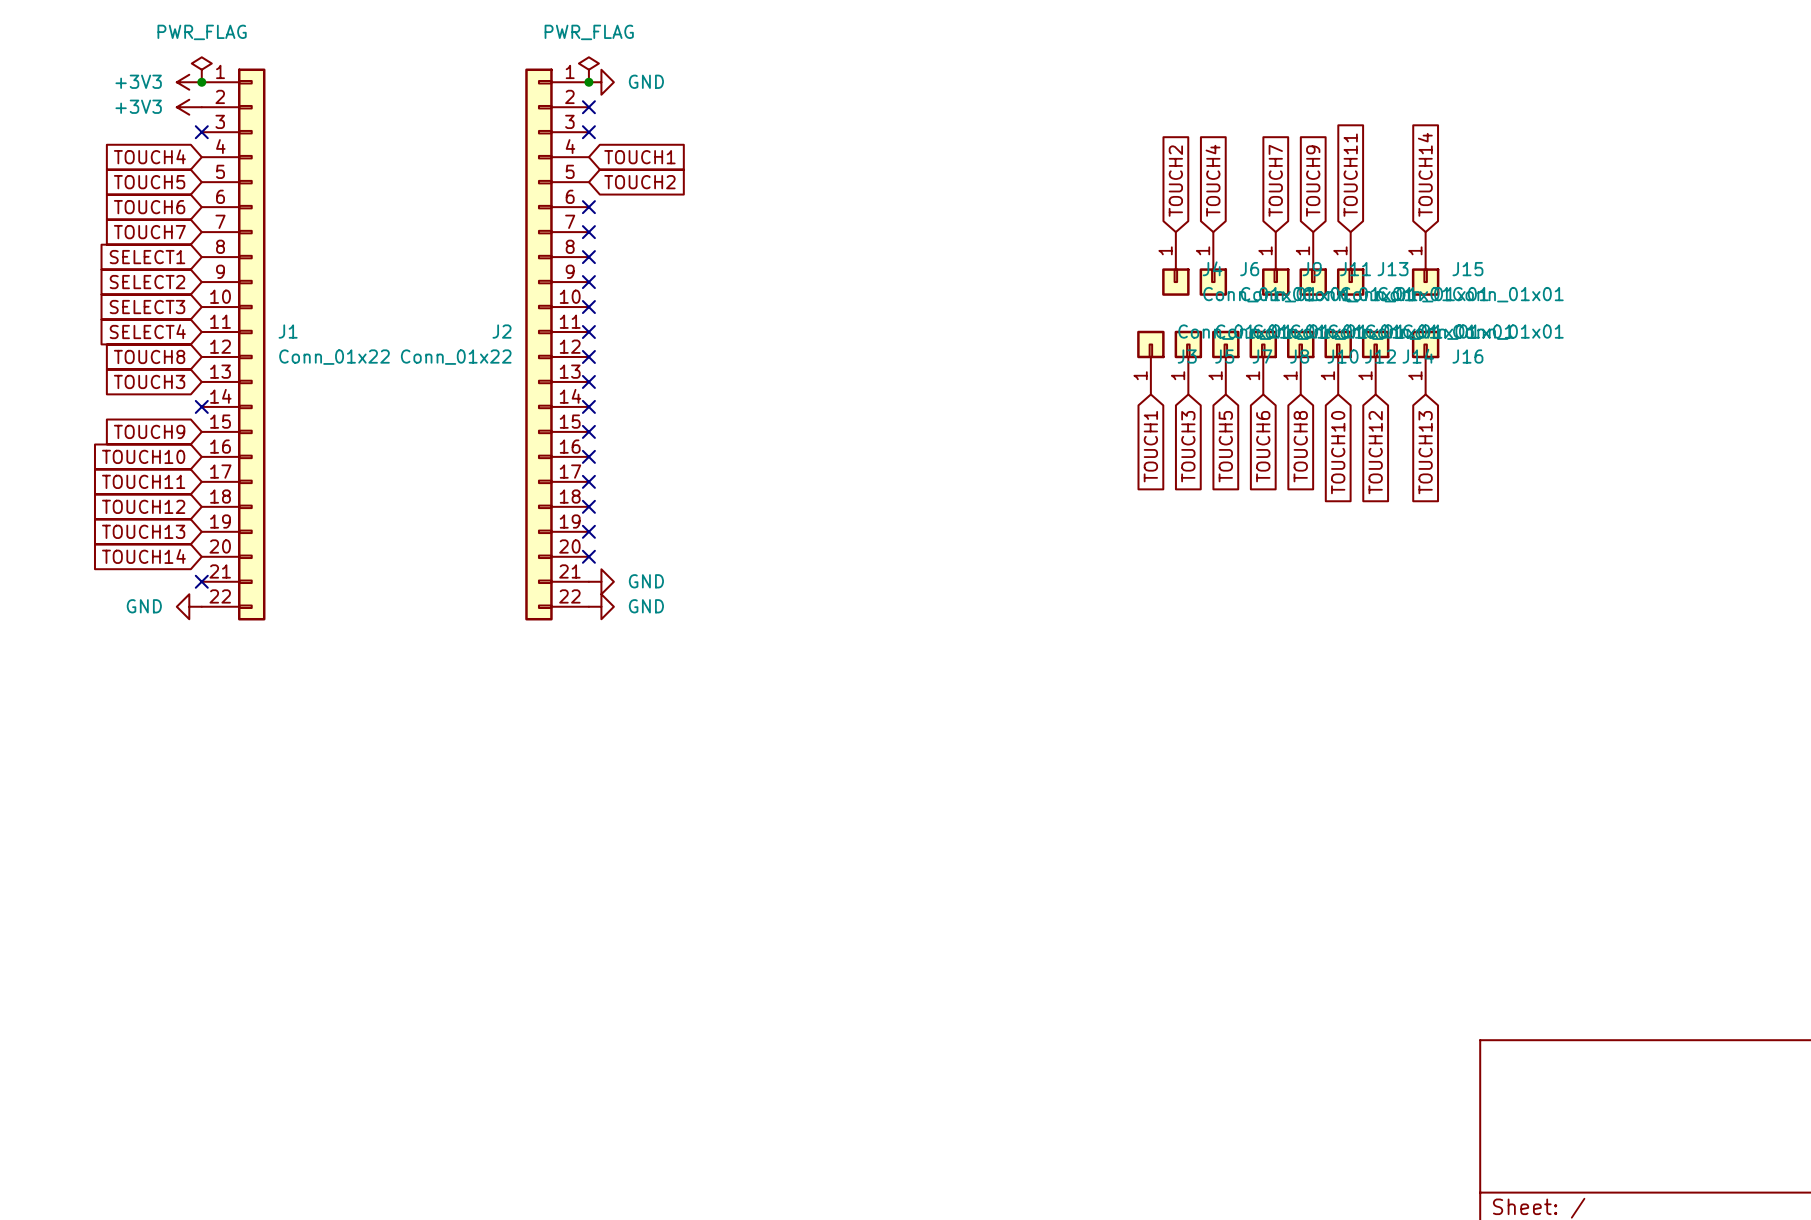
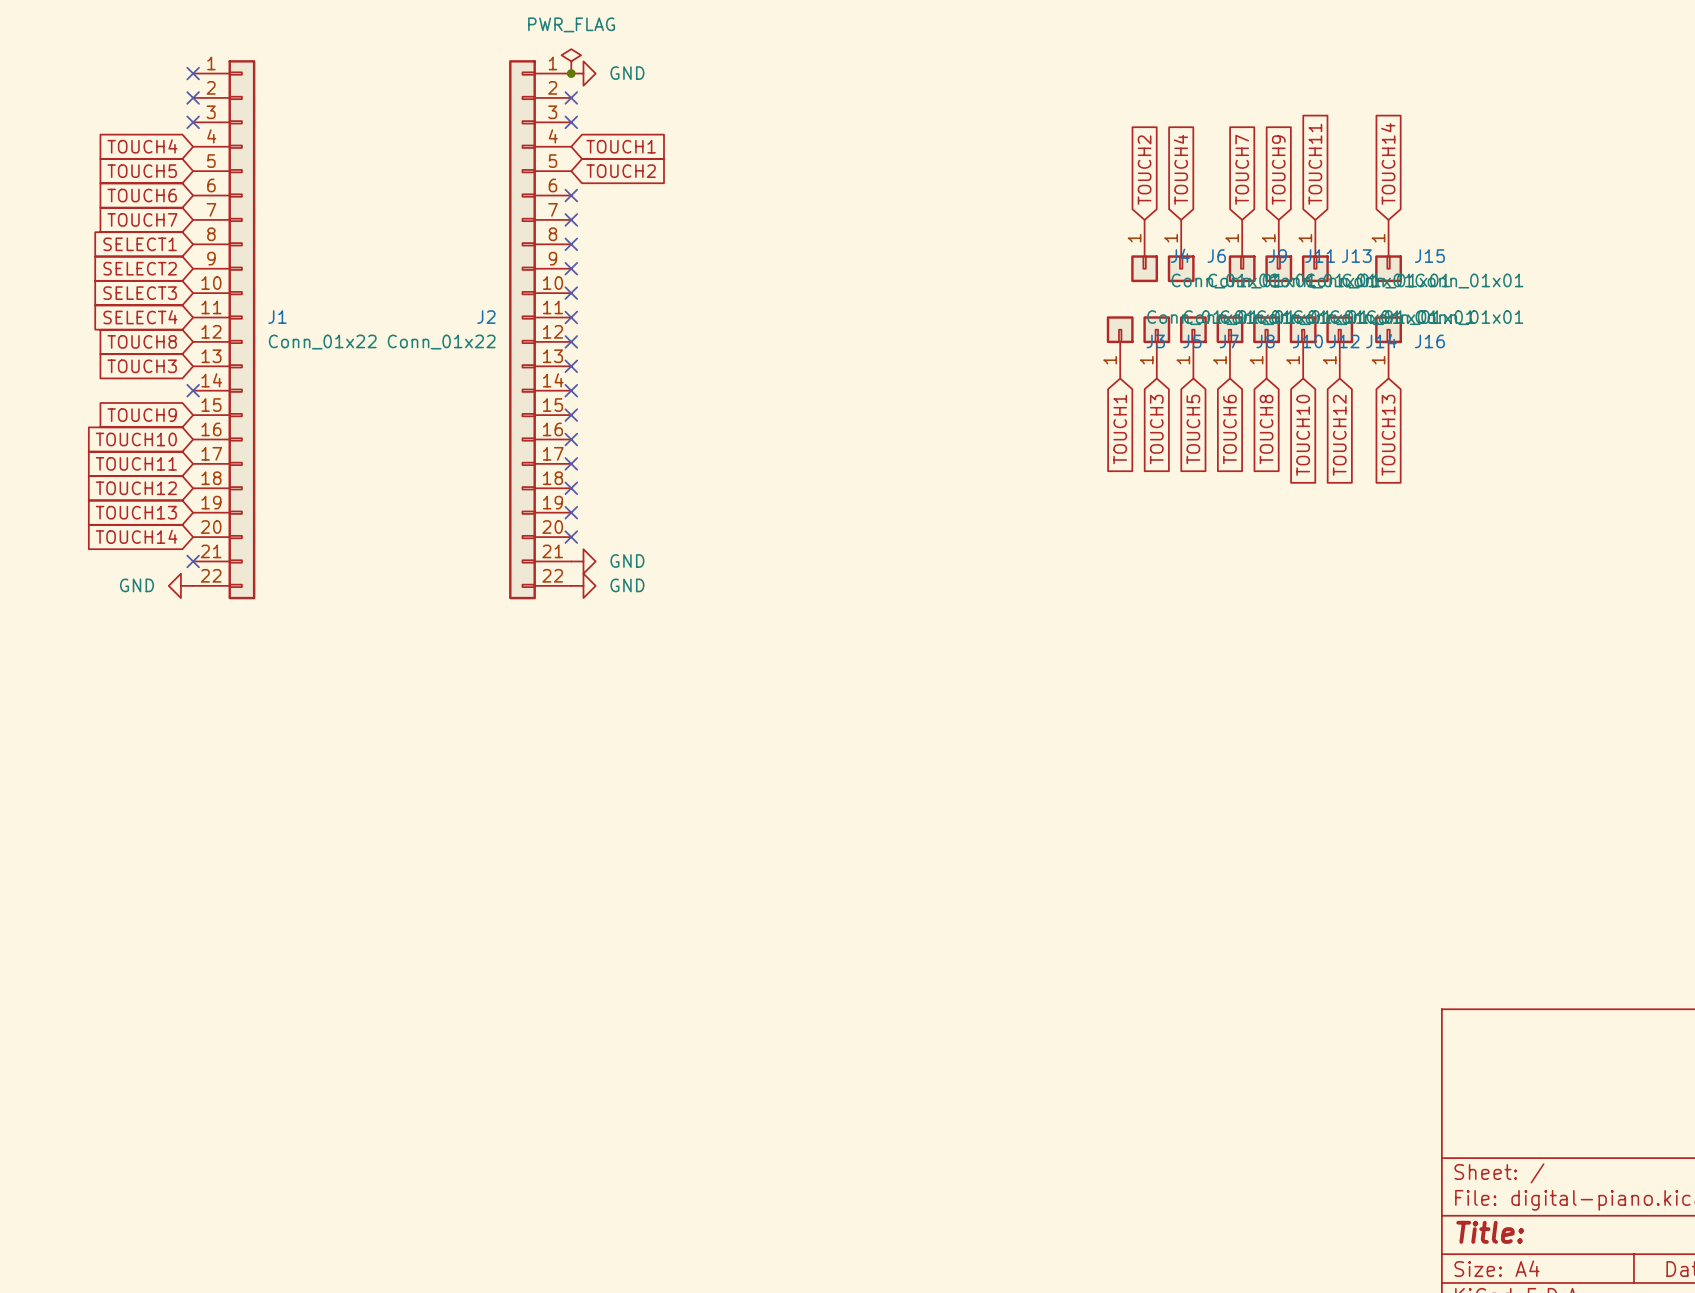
power symbol: PWR_FLAG (201, 69) -> none
power symbol: +3V3 (189, 82) -> none
junction: (201, 82) -> none
no-connect mark: none -> (193, 73)
power symbol: +3V3 (189, 107) -> none
no-connect mark: none -> (193, 97)

